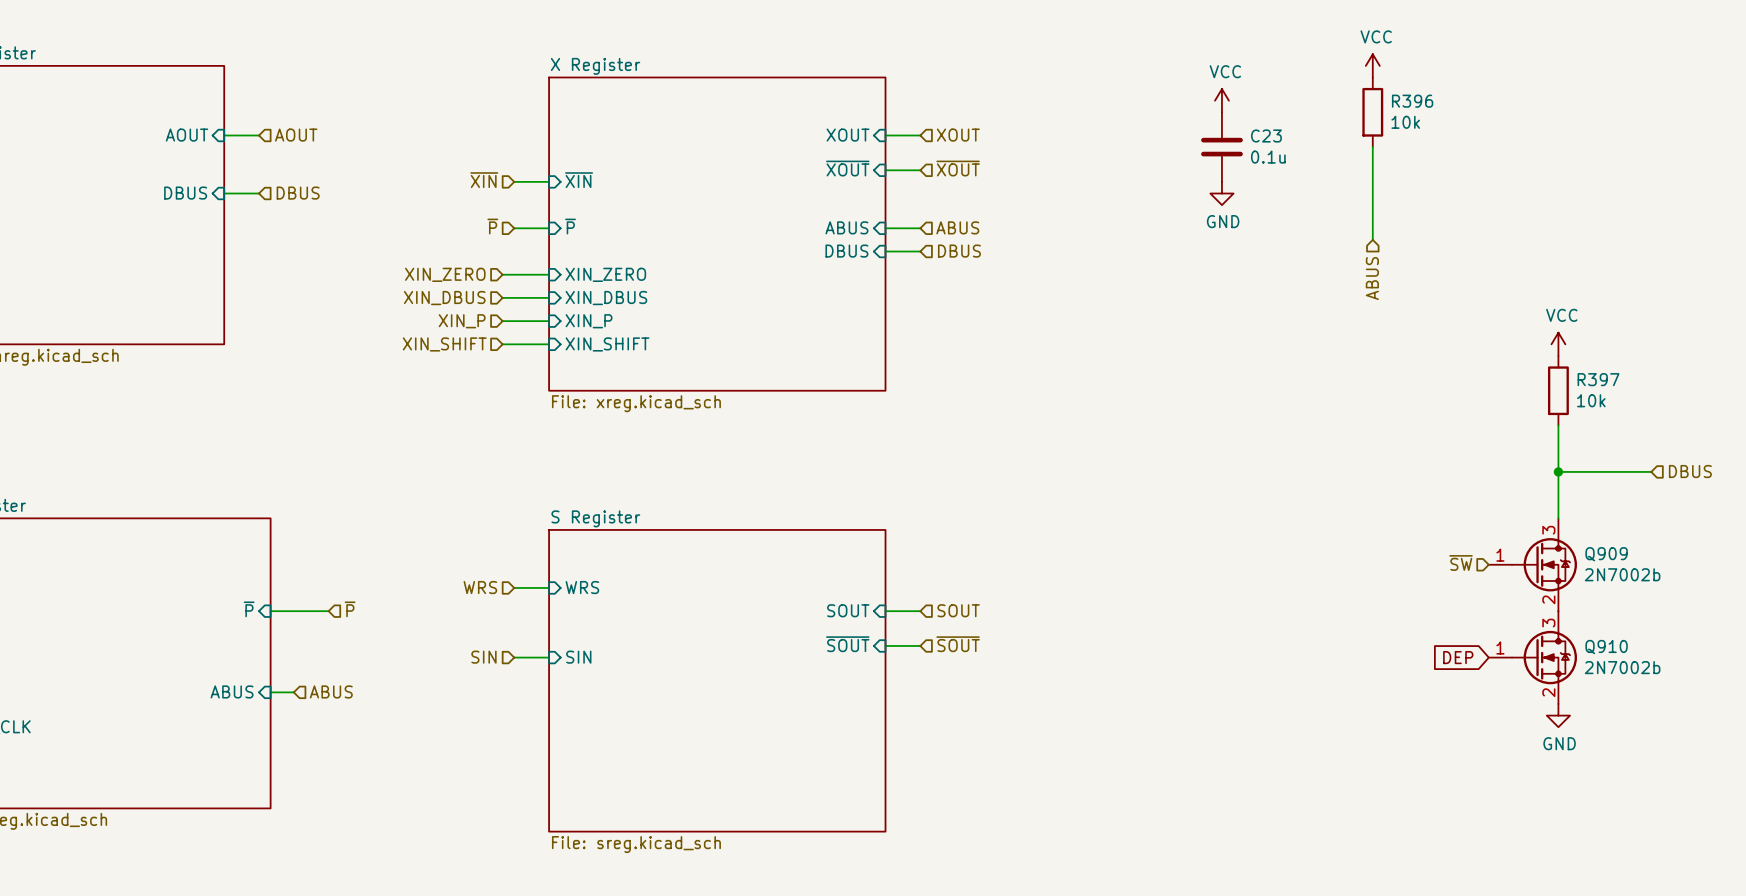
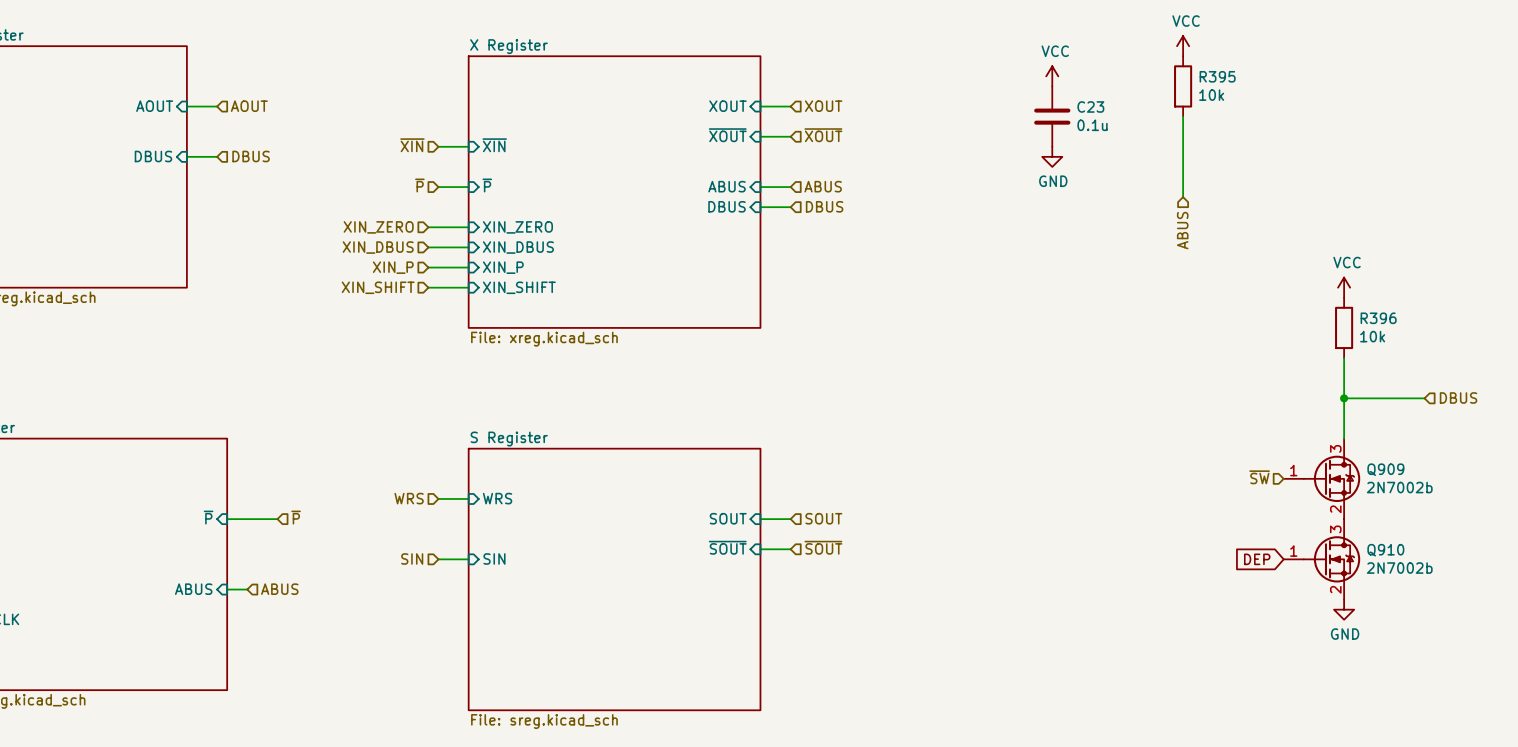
R396 name: R396 (1412, 101) -> R395 (1217, 76)
R397 name: R397 (1598, 379) -> R396 (1378, 318)

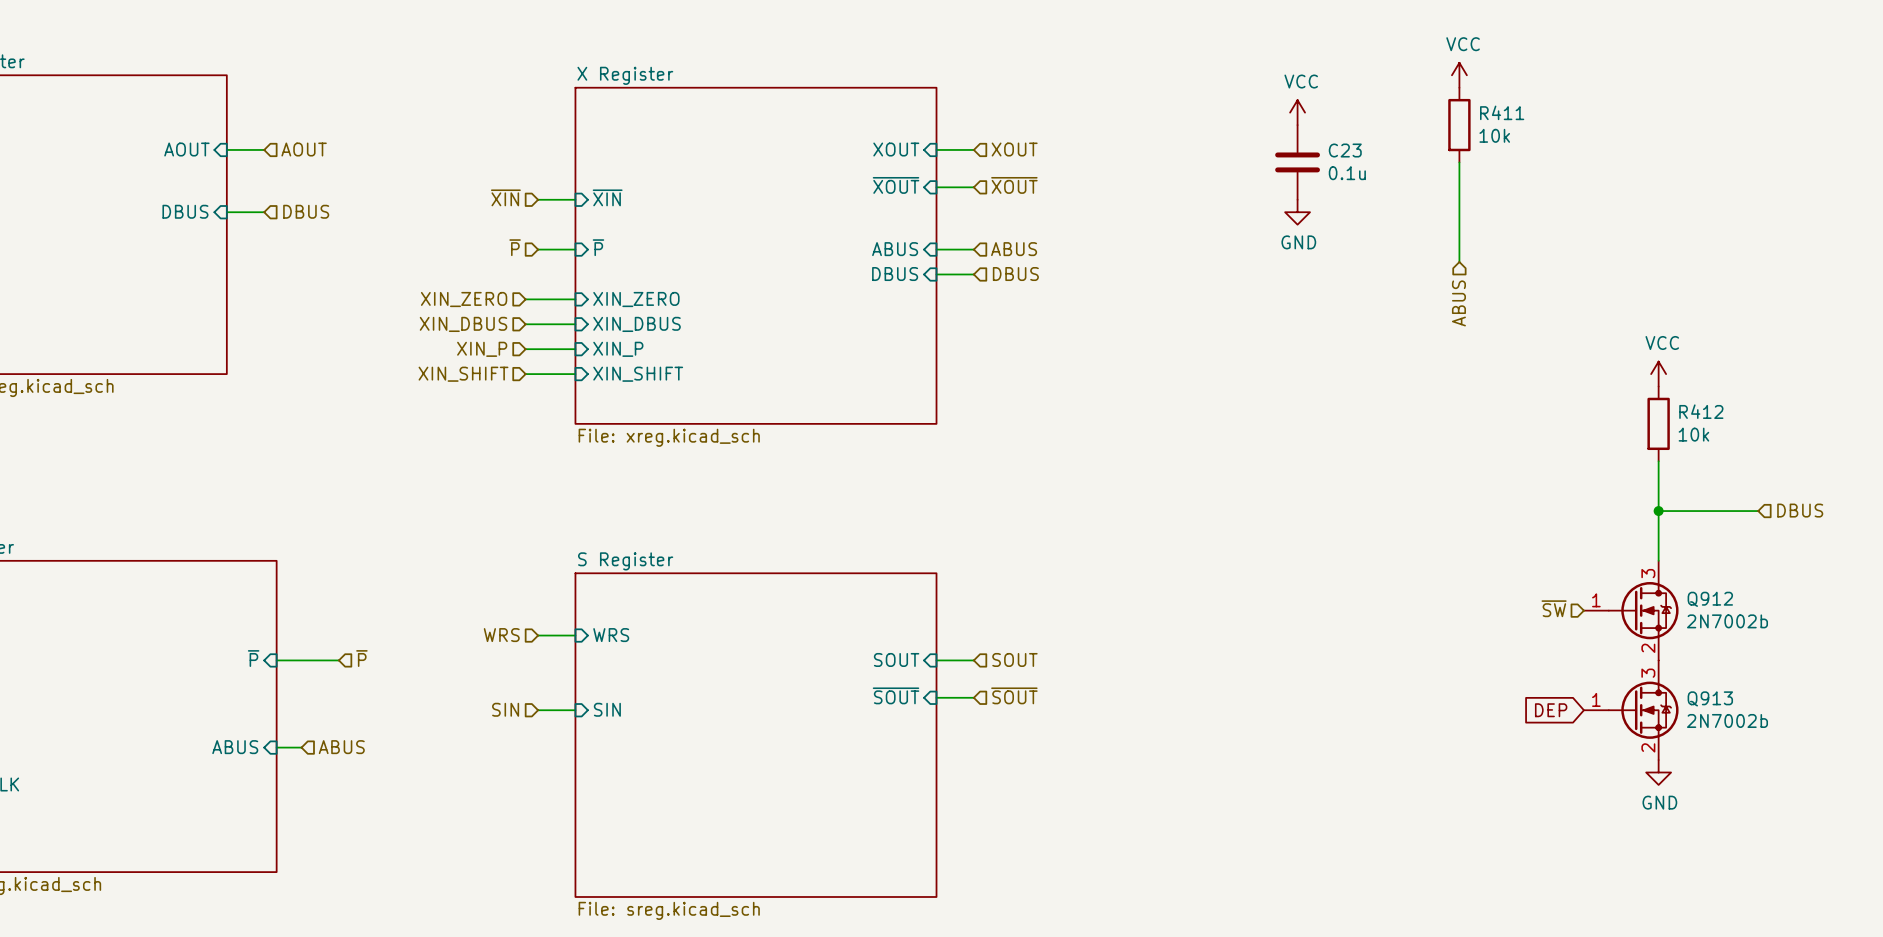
R395 name: R395 (1217, 76) -> R411 (1502, 112)
R396 name: R396 (1378, 318) -> R412 (1701, 411)
Q909 name: Q909 (1385, 469) -> Q912 (1710, 599)
Q910 name: Q910 (1385, 550) -> Q913 (1710, 698)

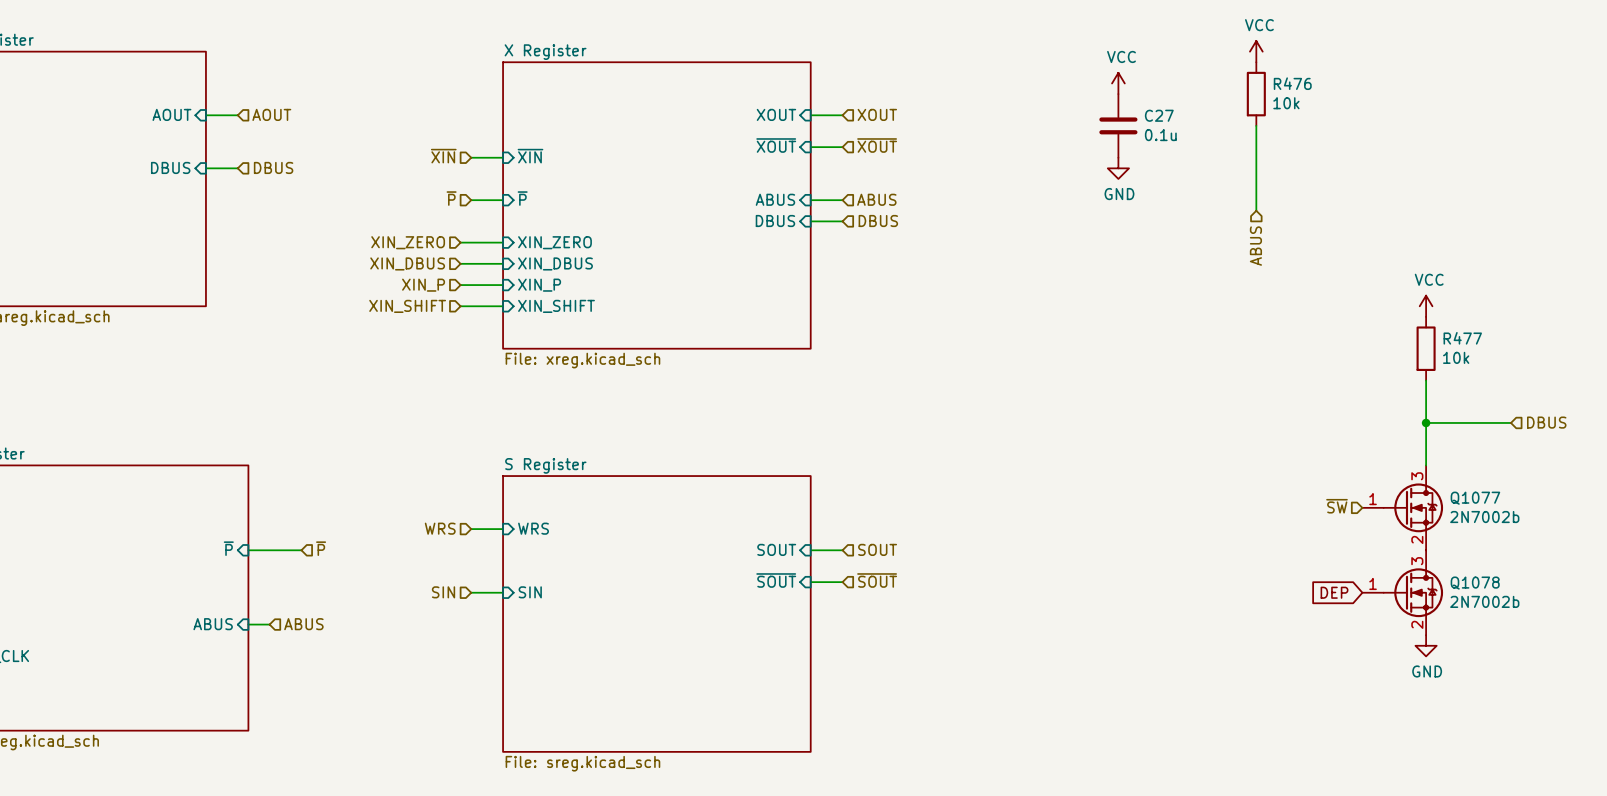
R411 name: R411 (1502, 112) -> R476 (1292, 83)
C23 name: C23 (1345, 150) -> C27 (1159, 115)
R412 name: R412 (1701, 411) -> R477 (1462, 338)
Q912 name: Q912 (1710, 599) -> Q1077 (1475, 498)
Q913 name: Q913 (1710, 698) -> Q1078 (1475, 583)

